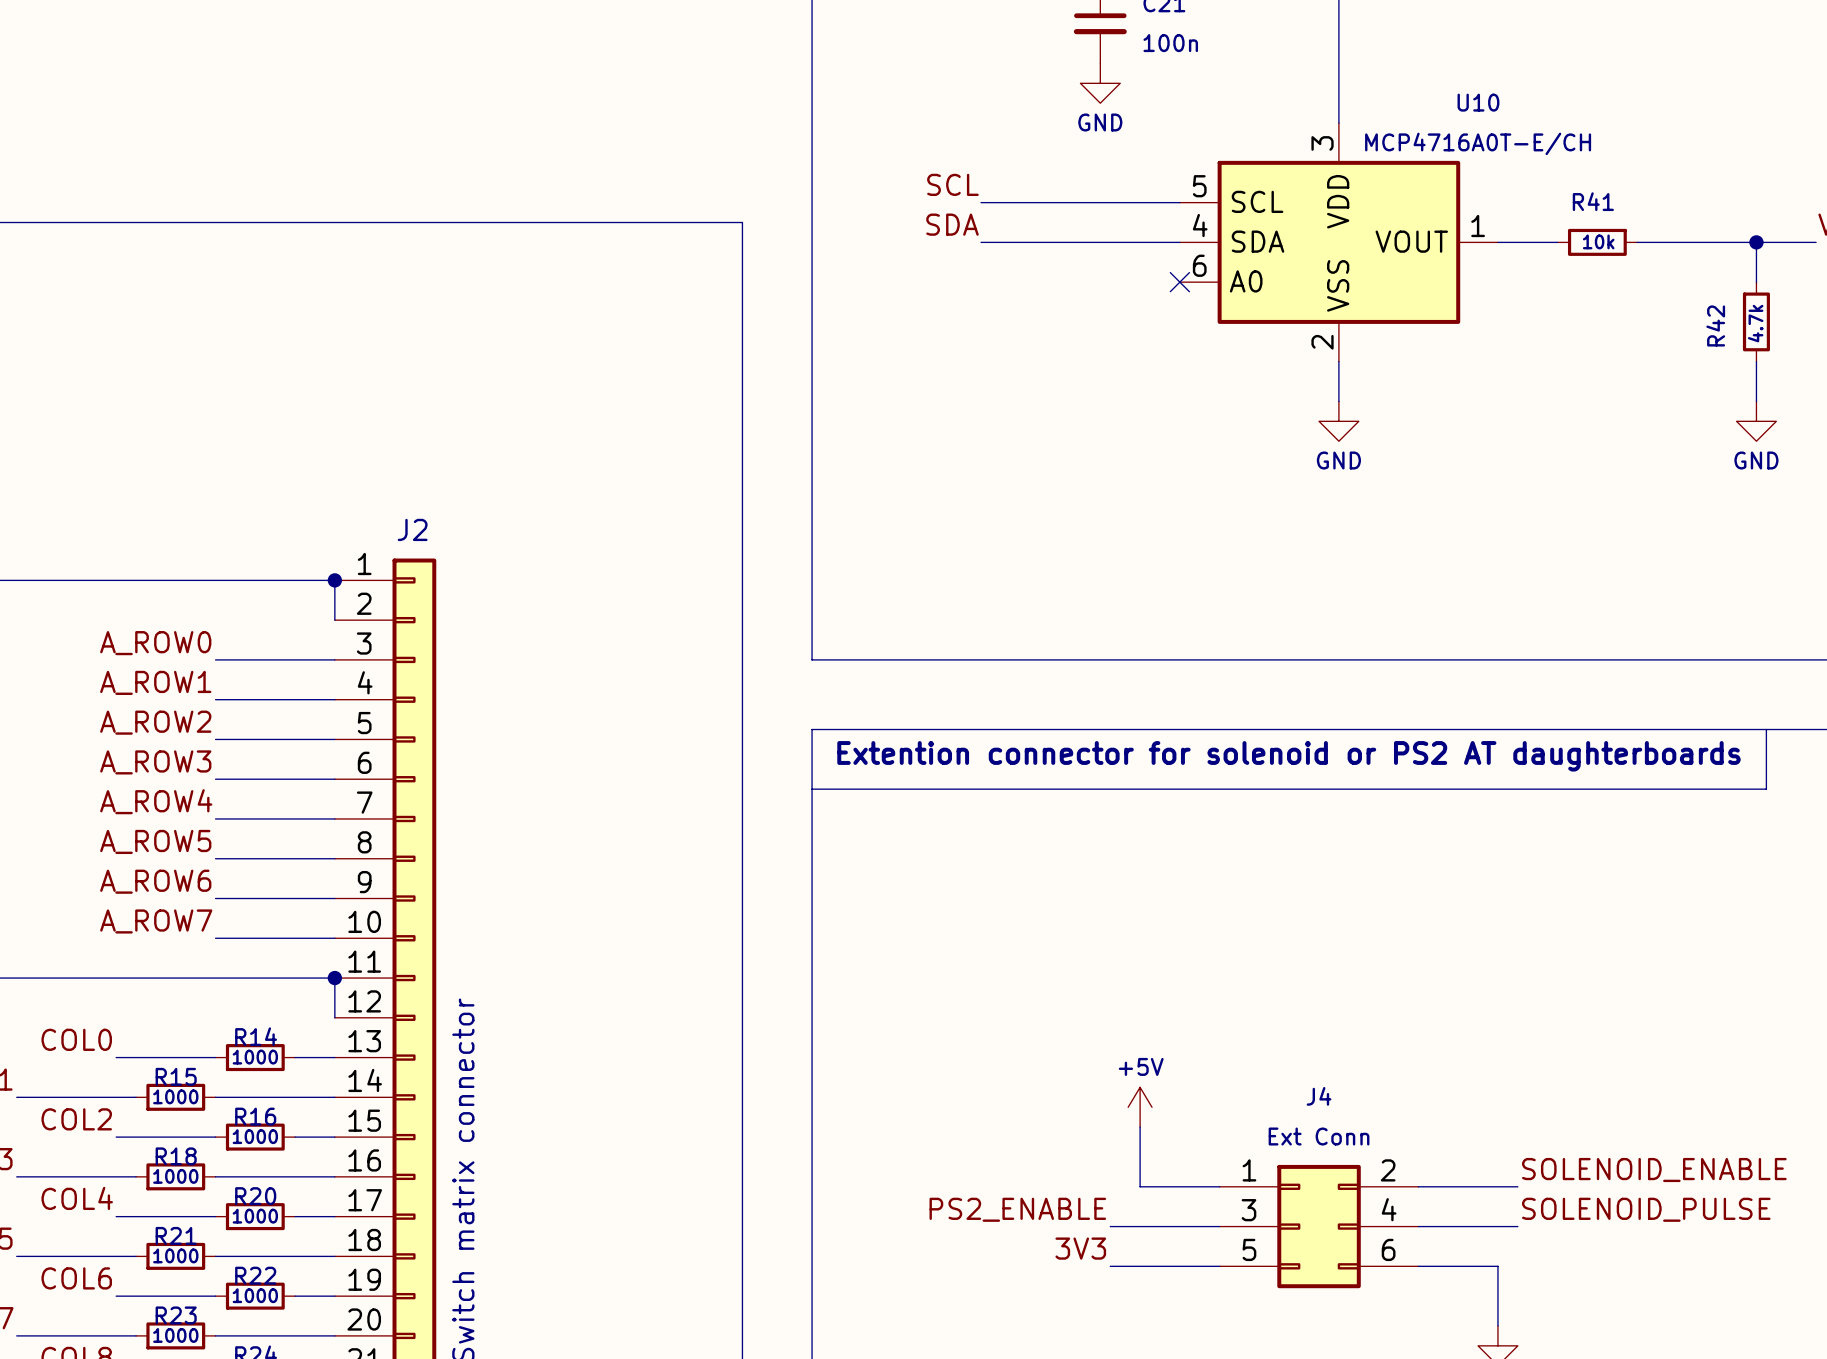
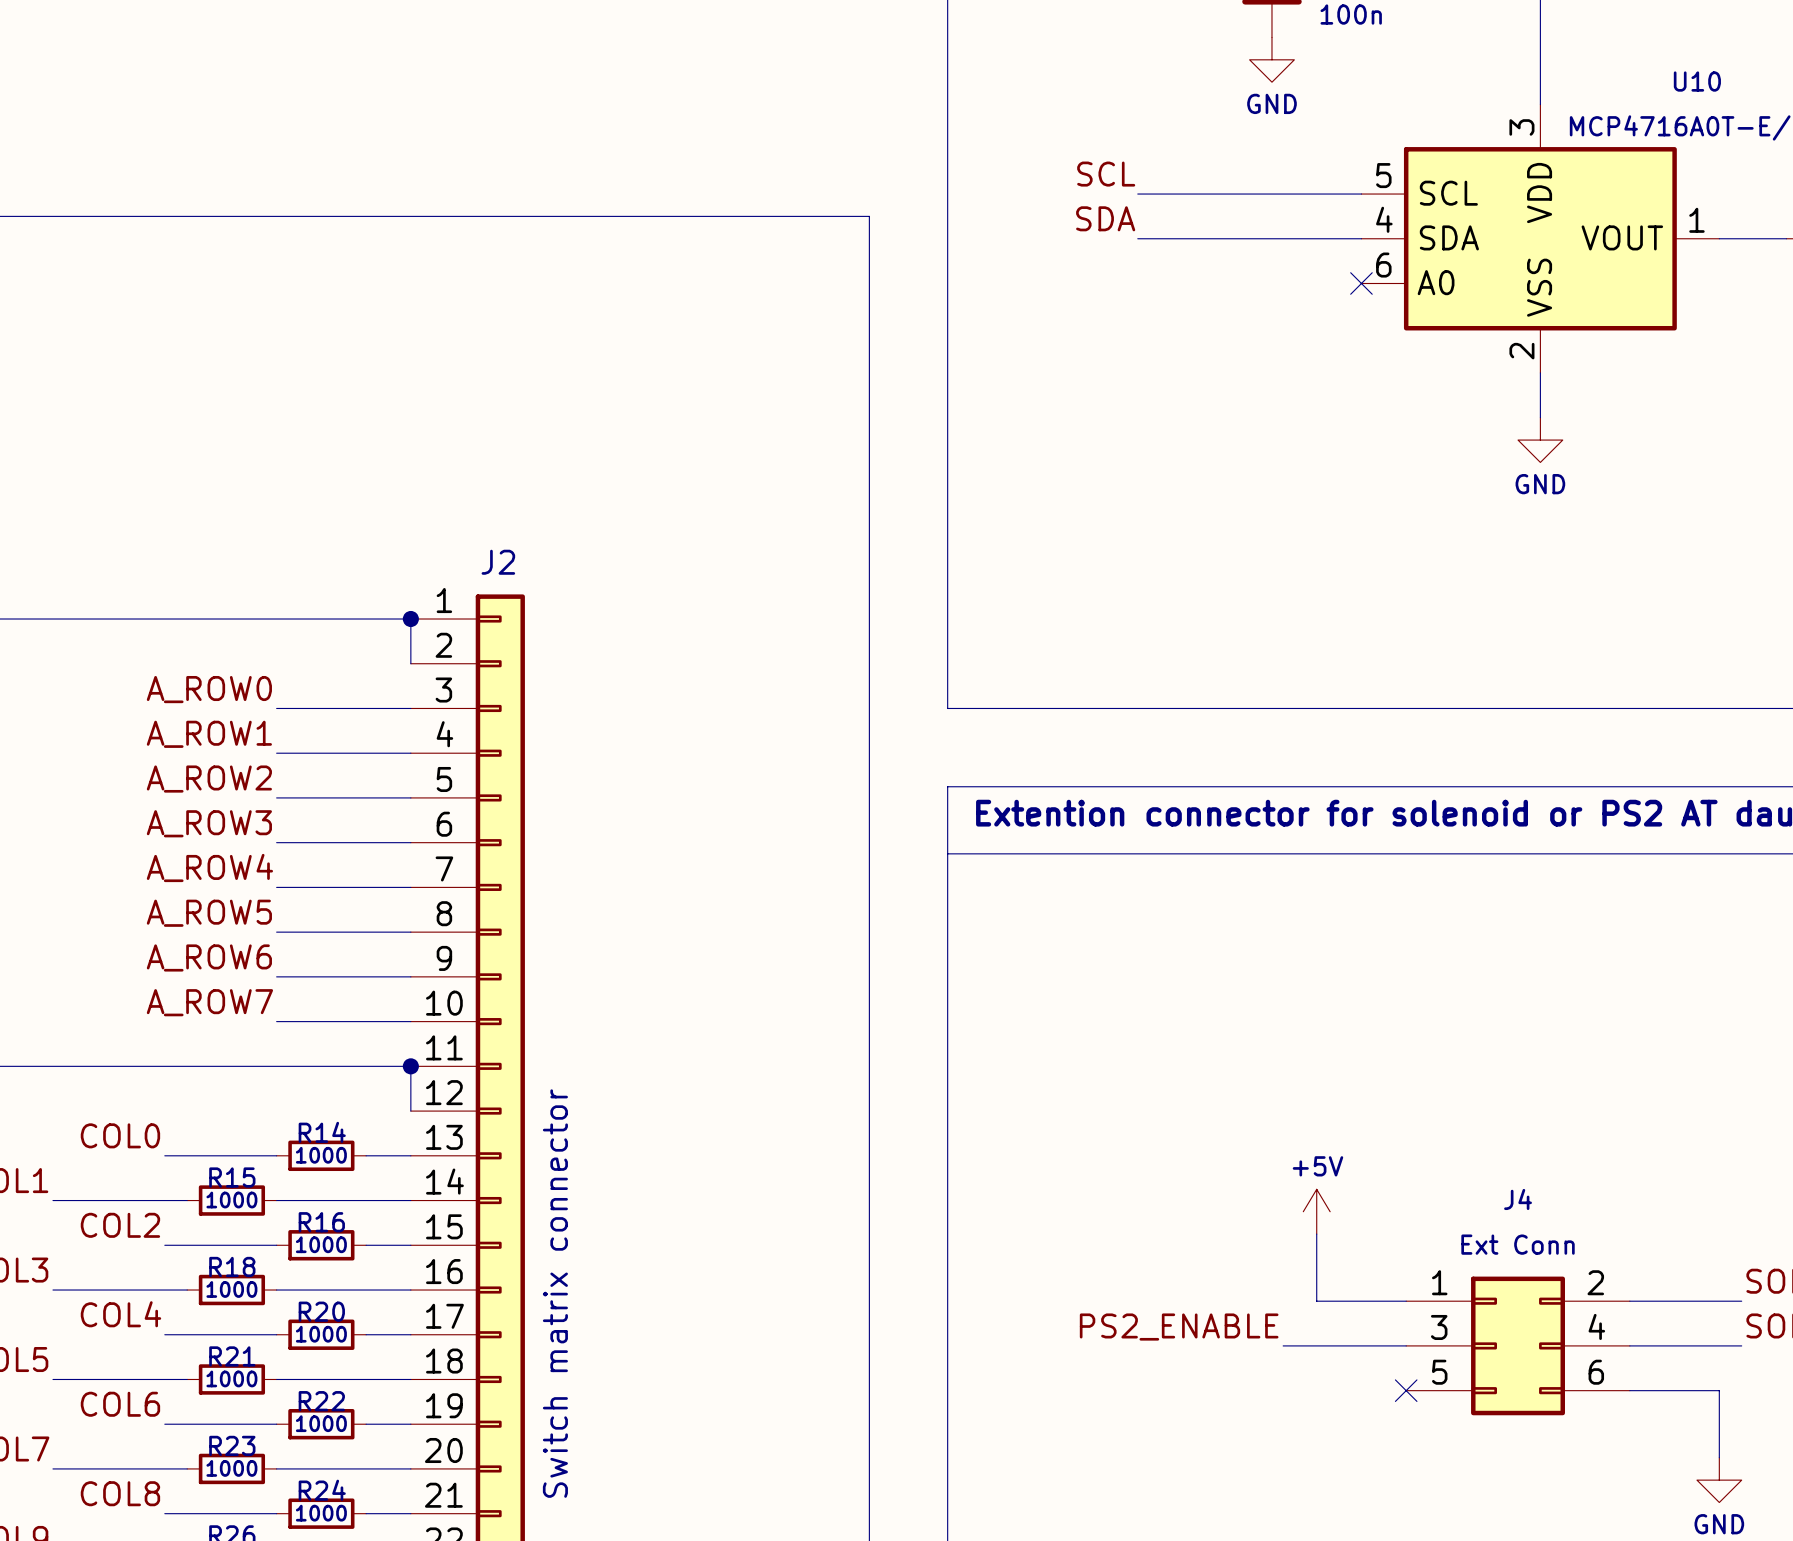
label: 3V3 (1080, 1248) -> none
wire: (1110, 1266) (1219, 1266) -> none
no-connect mark: none -> (1406, 1390)

